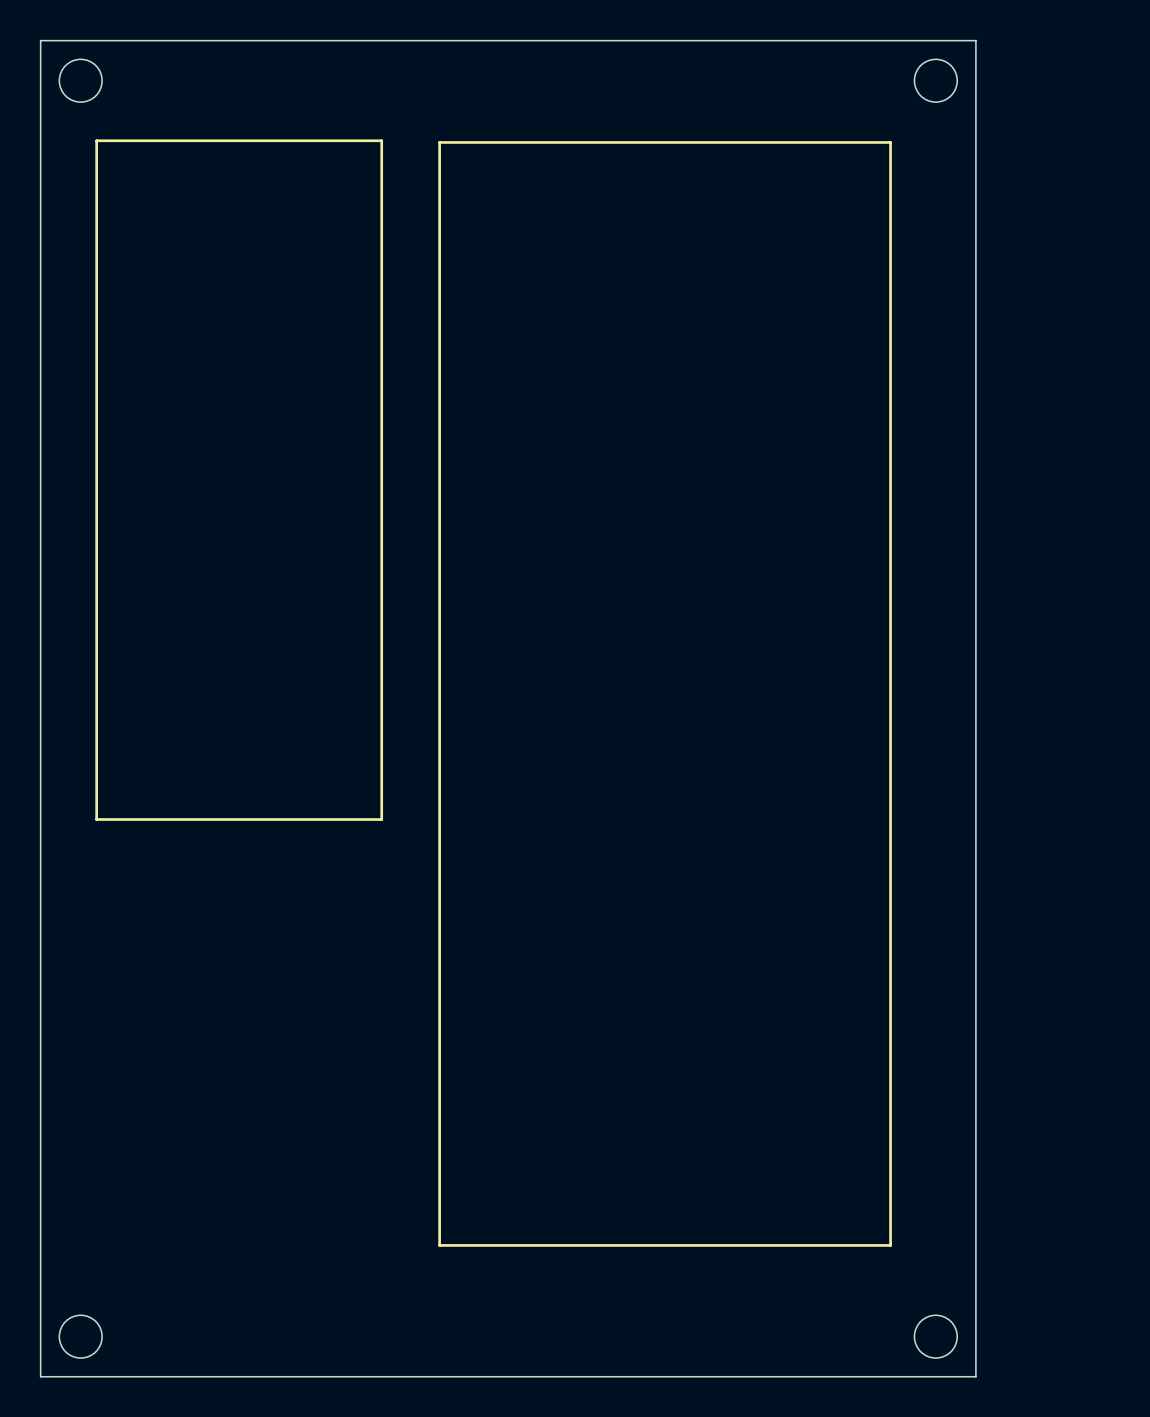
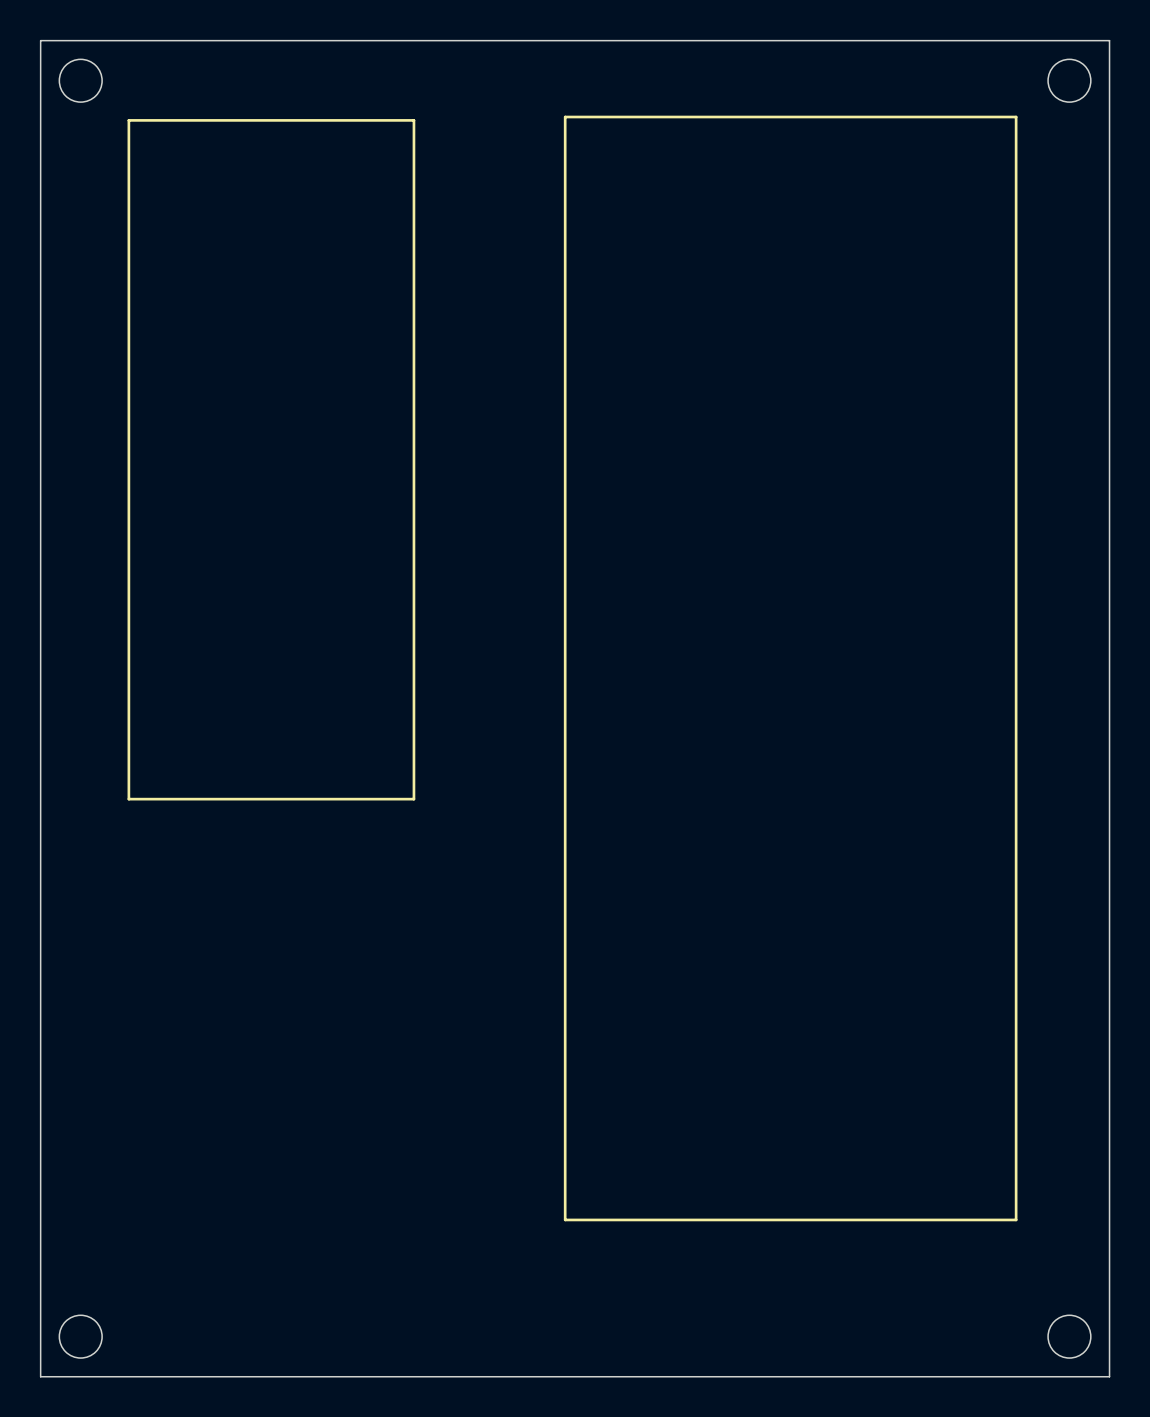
board edge: (975, 40) (975, 1376) -> (975, 40) (1109, 40) (1109, 1376) (975, 1376)
round board edge position: (935, 80) -> (1069, 80)
line: (96, 140) (381, 140) (381, 819) (96, 819) (96, 140) -> (128, 120) (413, 120) (413, 799) (128, 799) (128, 120)
line: (439, 142) (890, 142) (890, 1245) (439, 1245) (439, 142) -> (565, 117) (1016, 117) (1016, 1219) (565, 1219) (565, 117)
round board edge position: (935, 1336) -> (1069, 1336)

